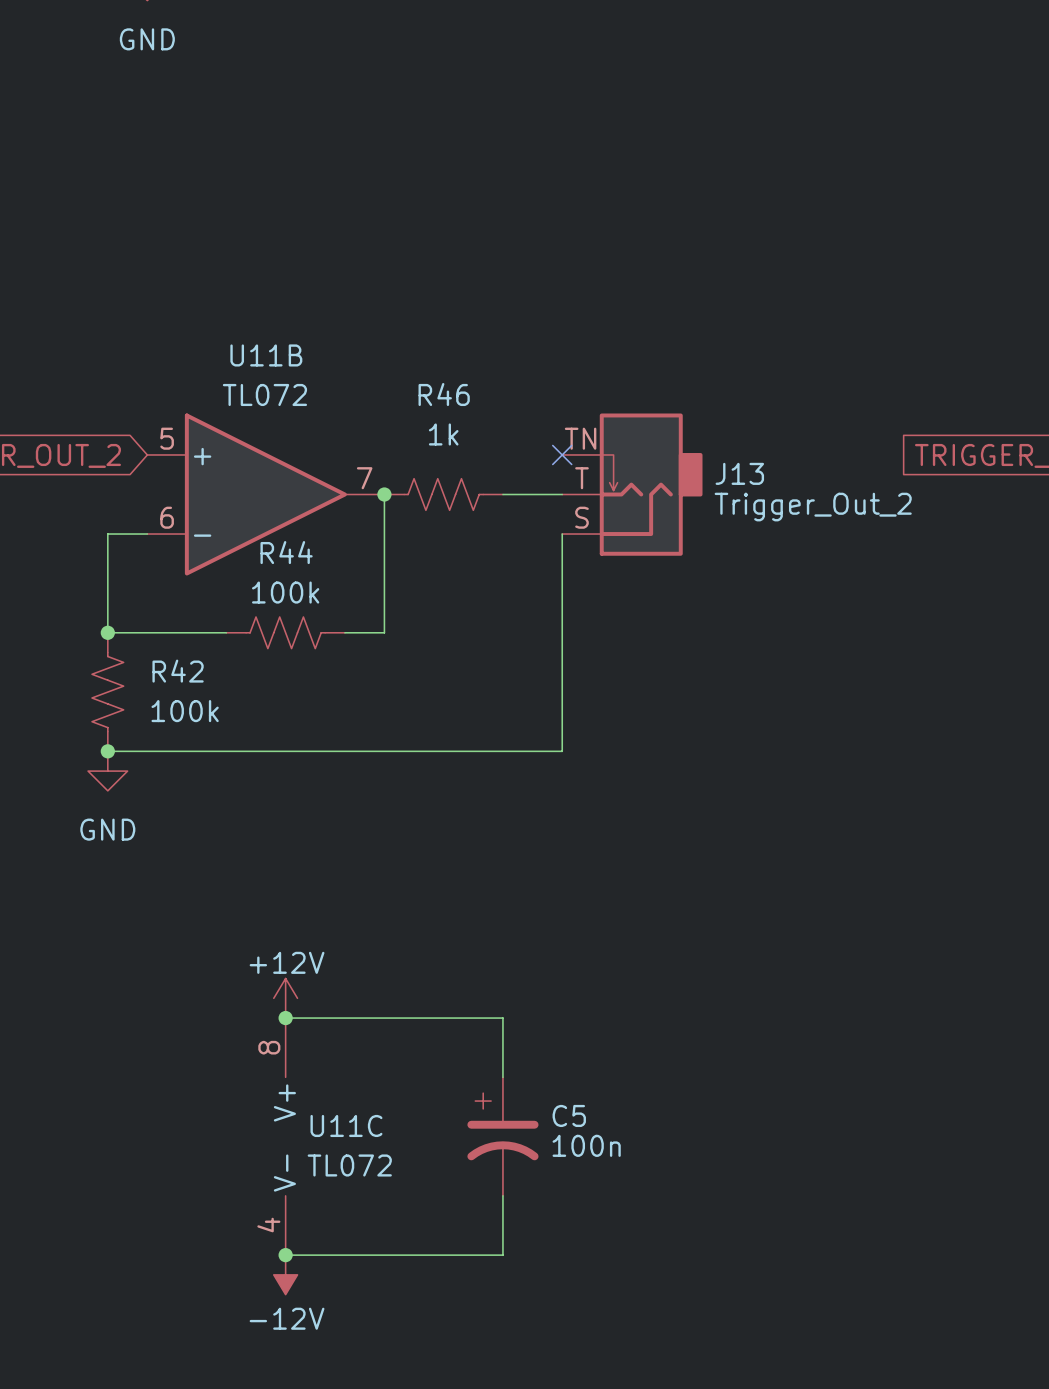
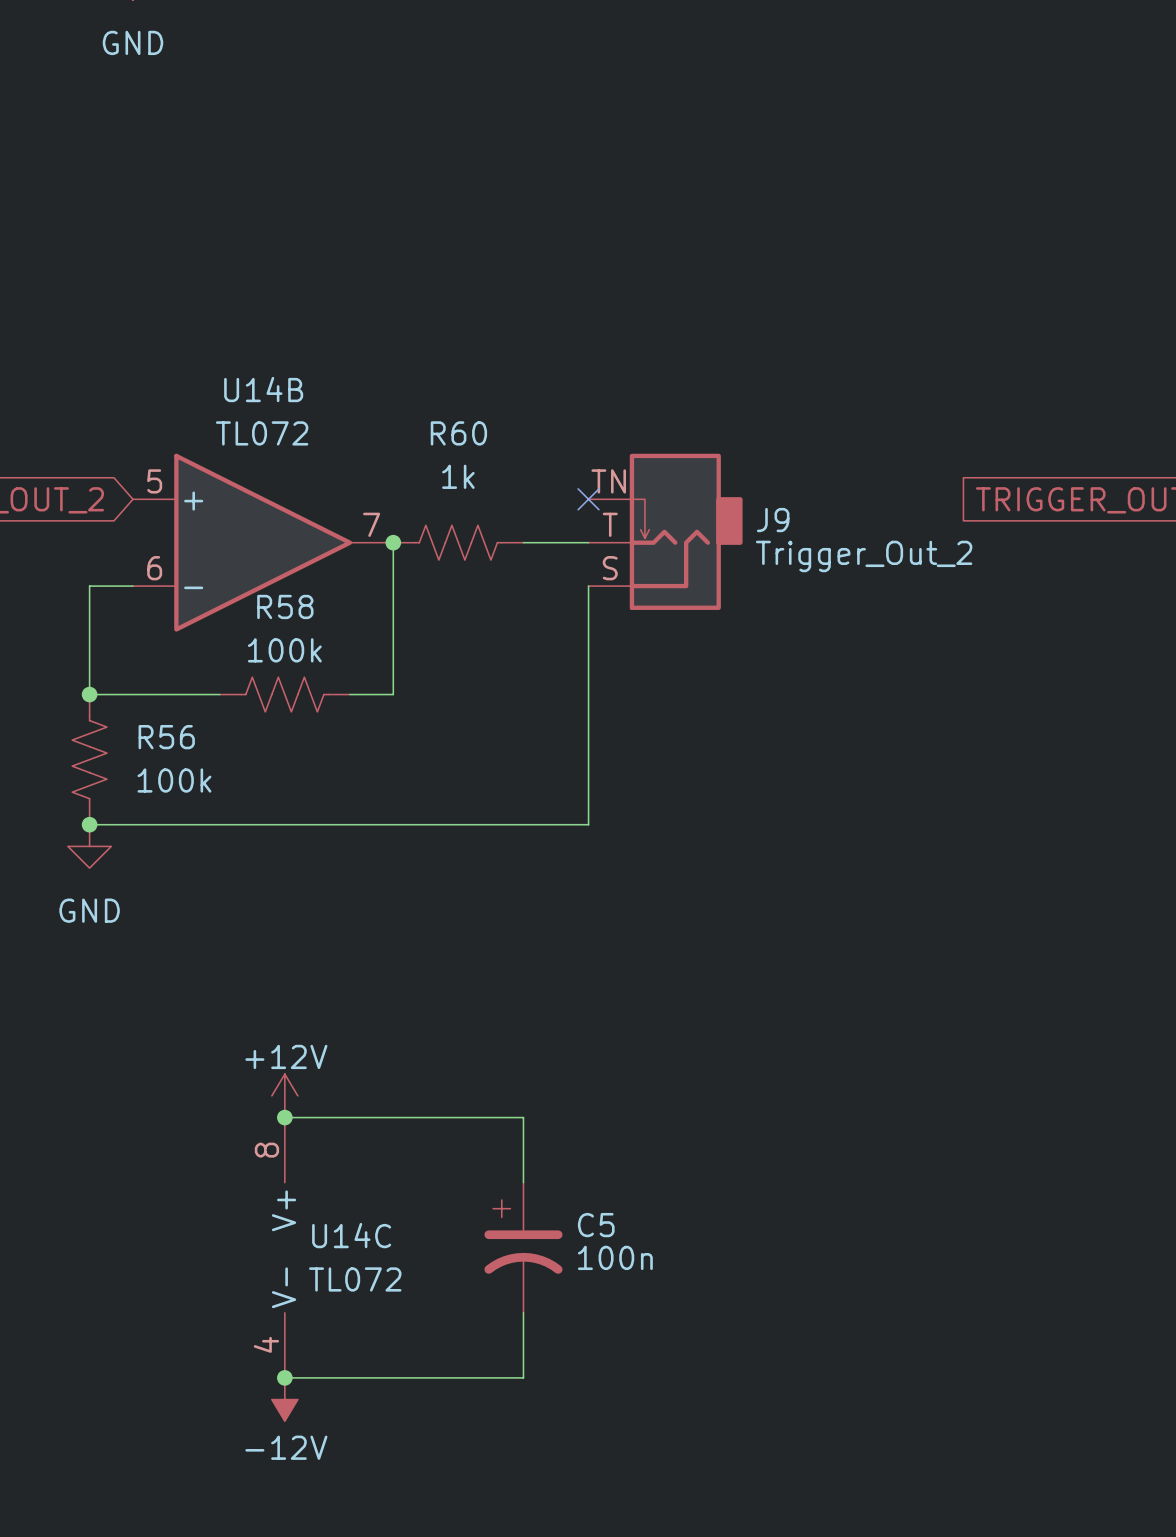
U11B name: U11B (266, 355) -> U14B (263, 389)
R46 name: R46 (444, 394) -> R60 (458, 433)
J13 name: J13 (739, 473) -> J9 (773, 520)
R44 name: R44 (286, 552) -> R58 (285, 606)
R42 name: R42 (178, 671) -> R56 (166, 737)
U11C name: U11C (346, 1125) -> U14C (351, 1235)

